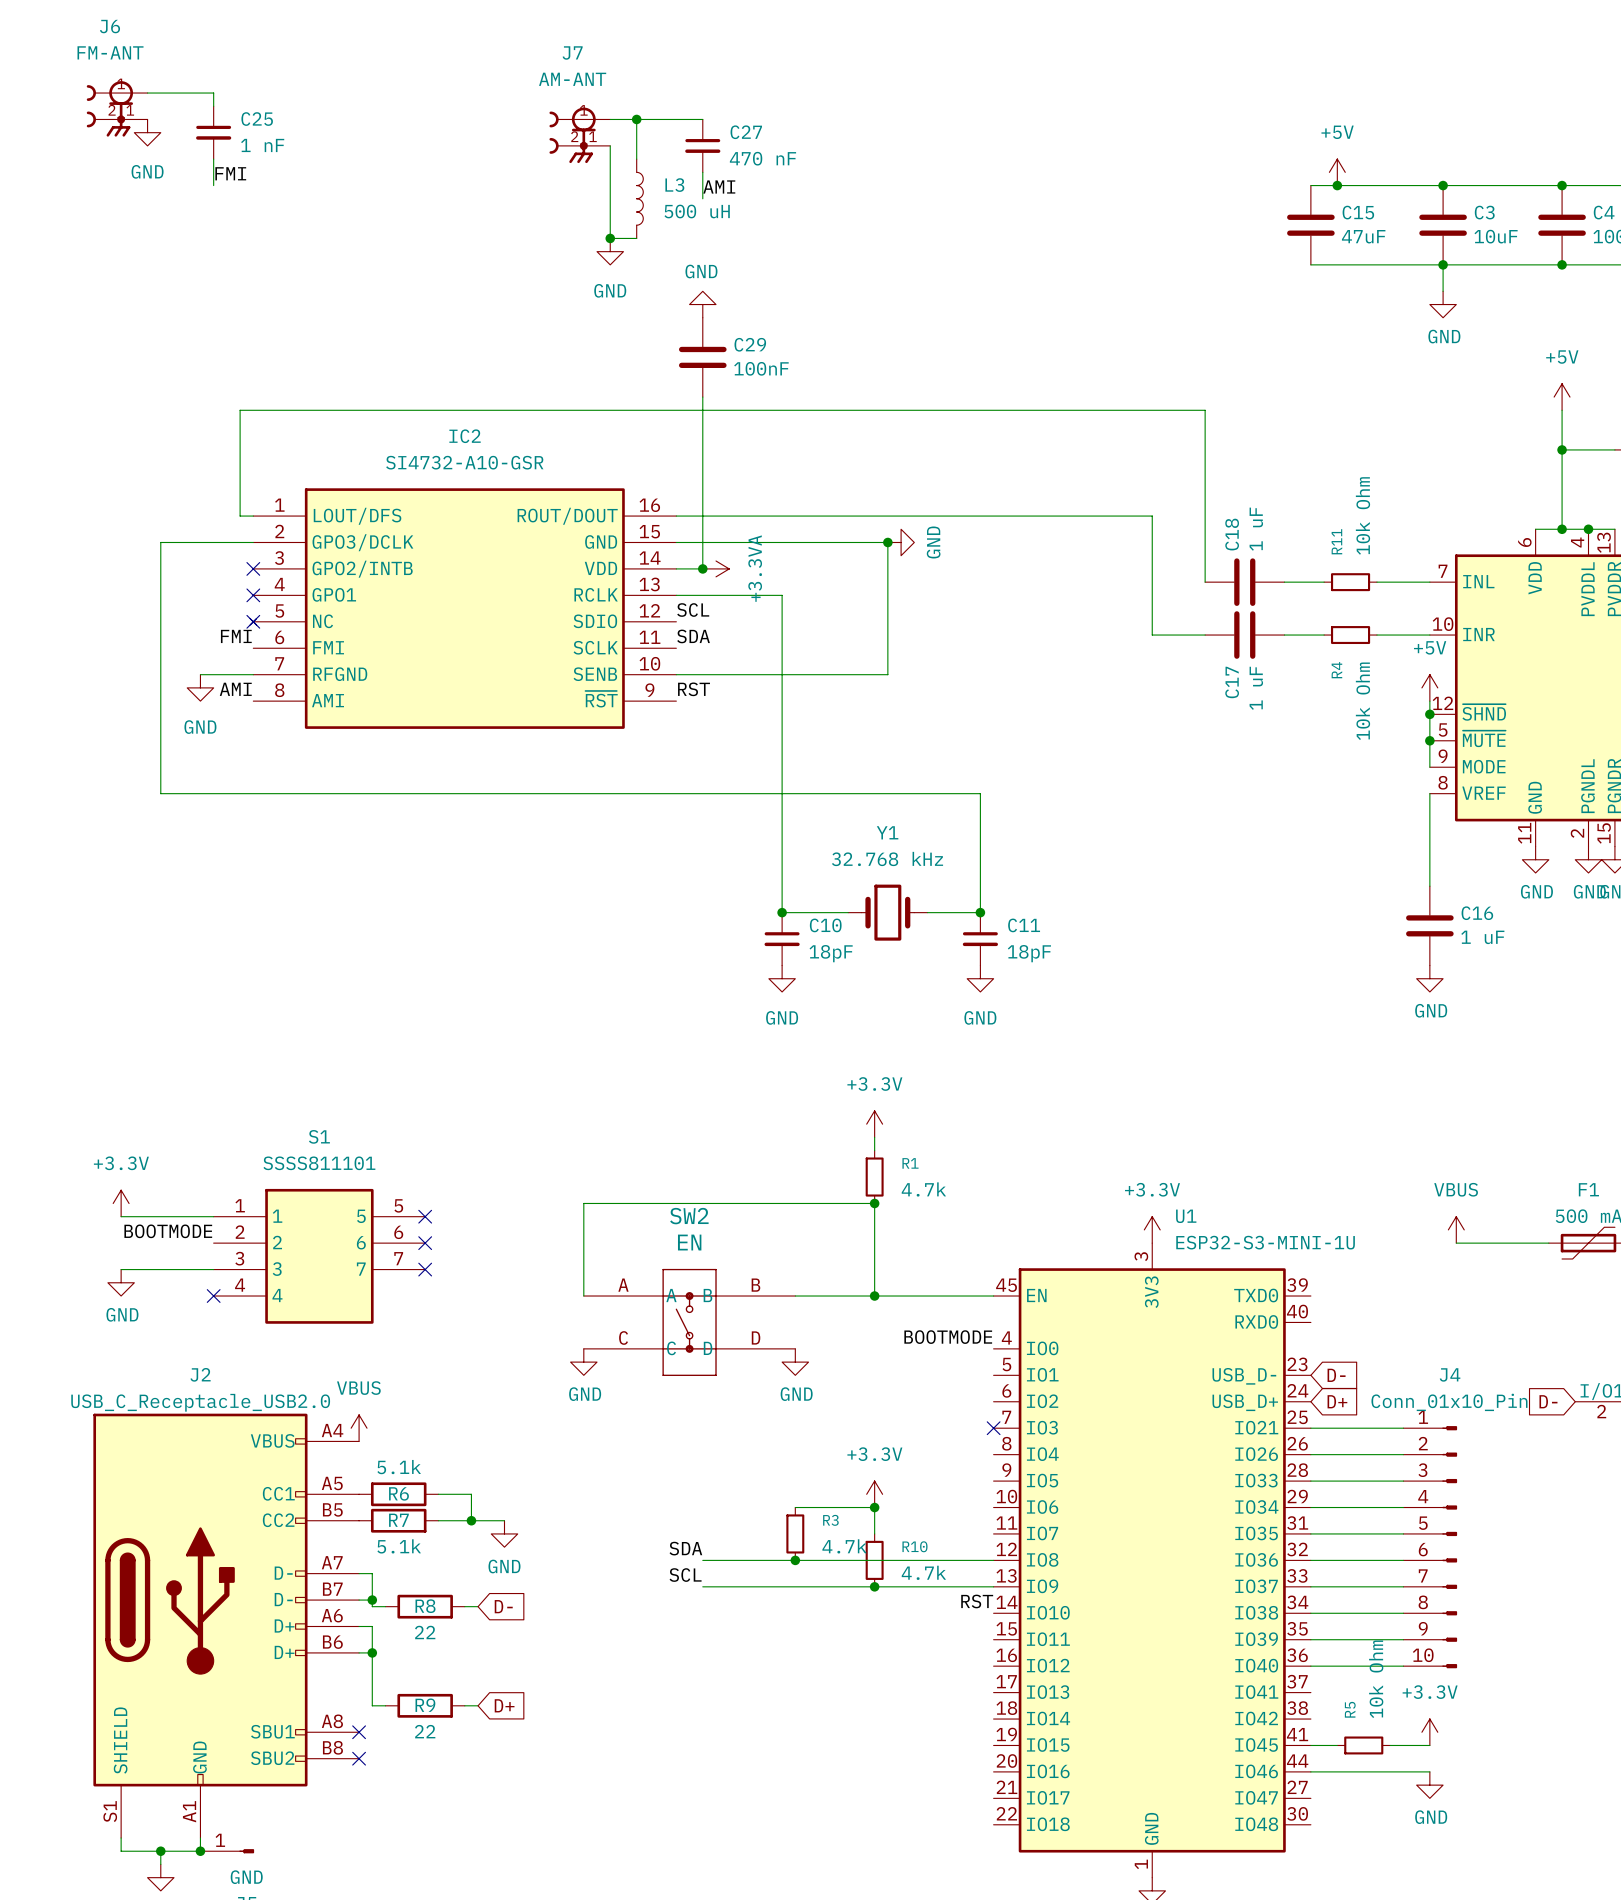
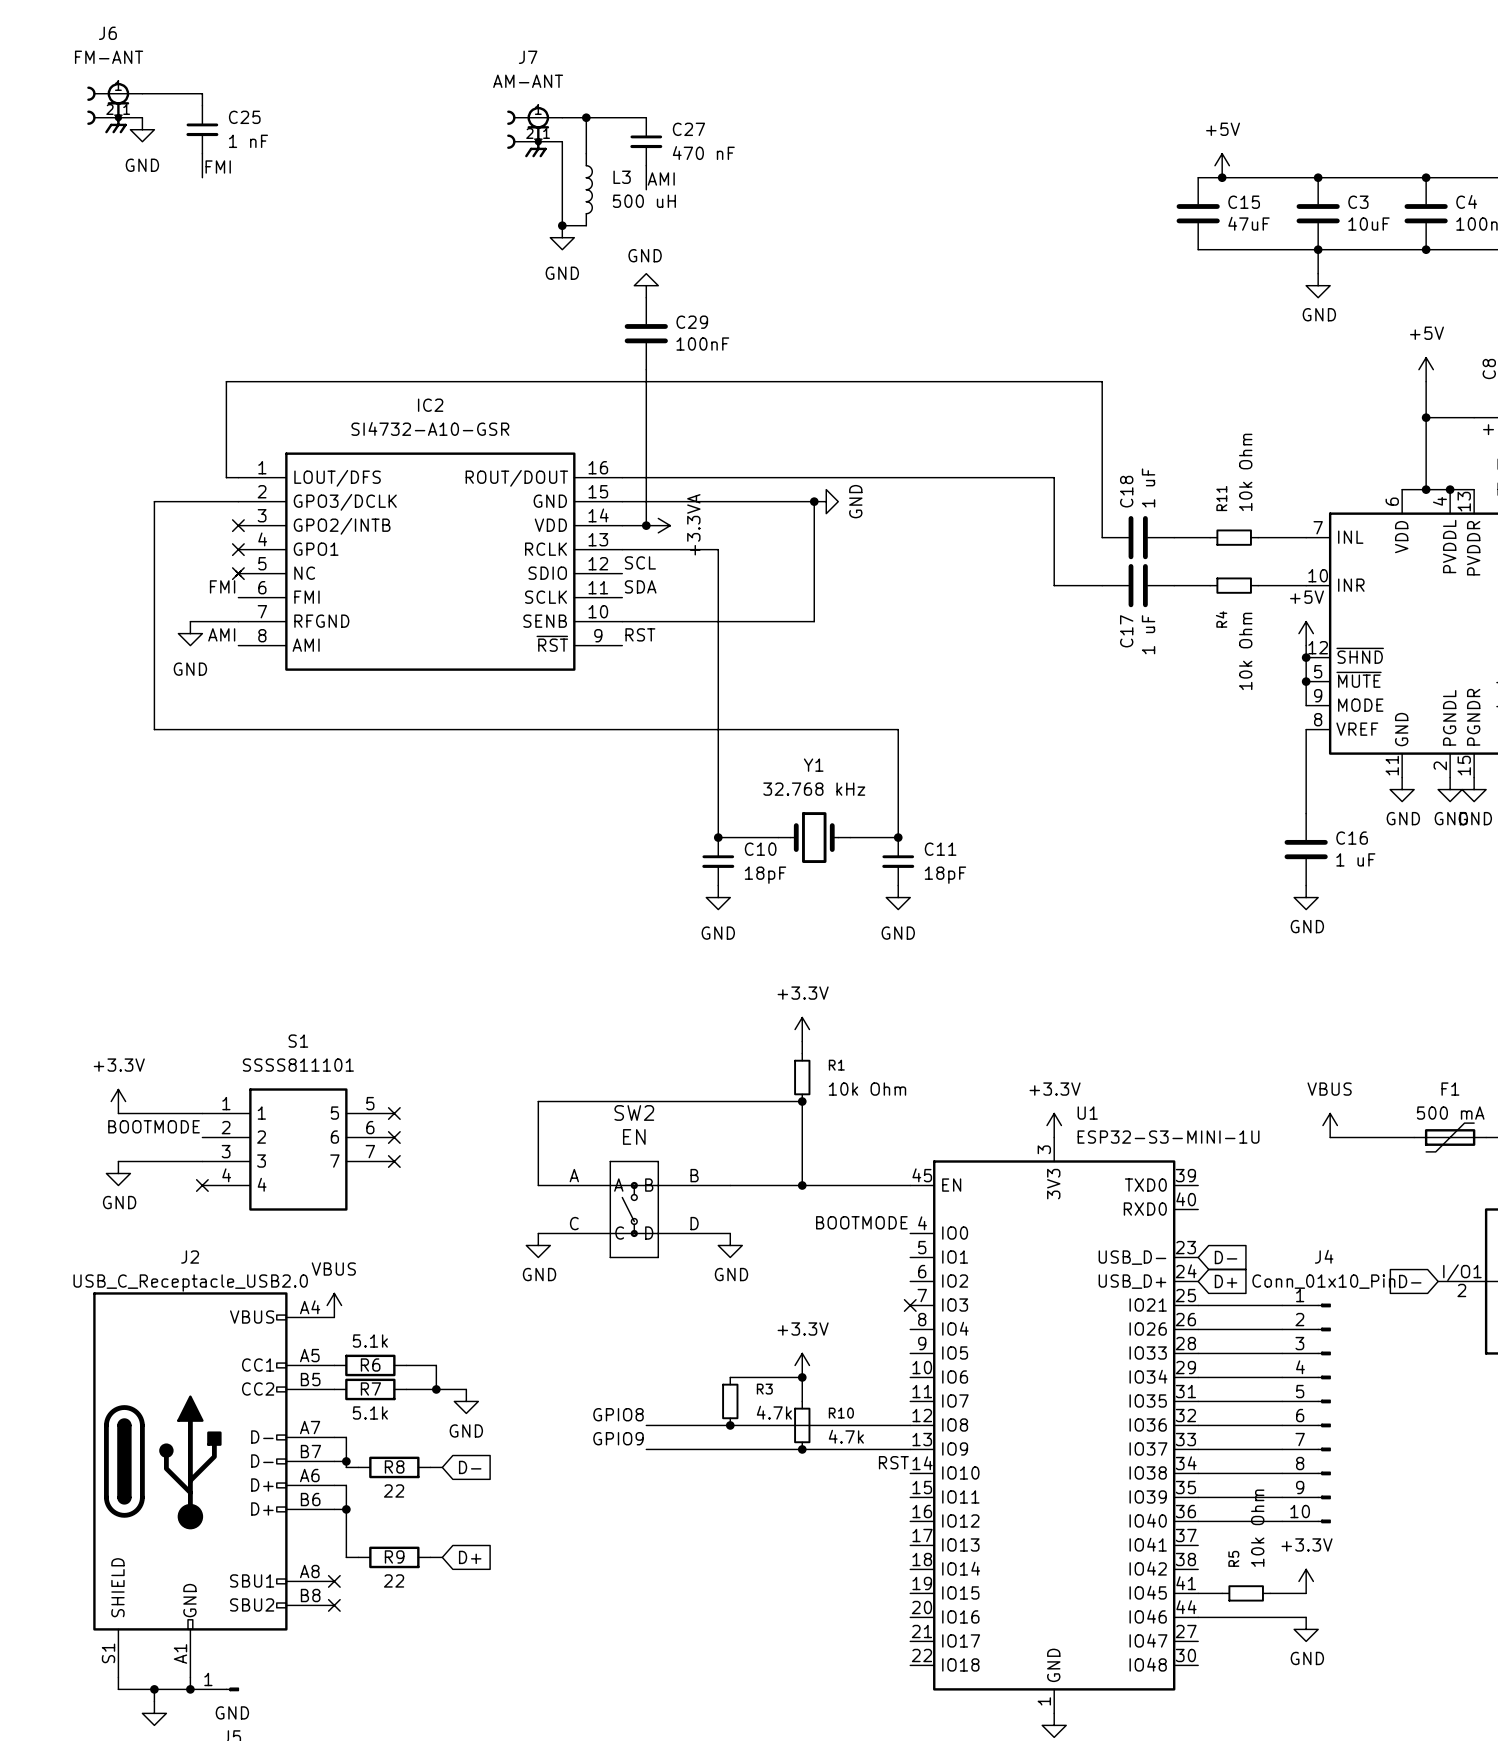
R1 value: 4.7k (923, 1189) -> 10k Ohm (867, 1089)
label: SDA (685, 1548) -> GPIO8 (618, 1414)
label: SCL (685, 1575) -> GPIO9 (618, 1438)

